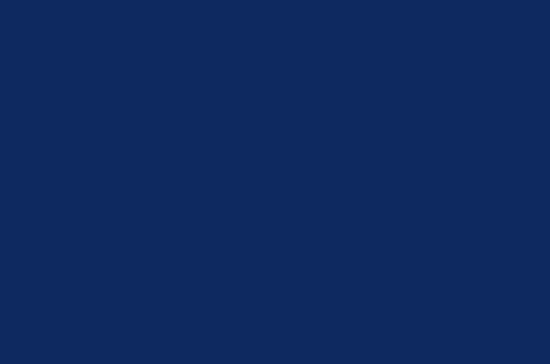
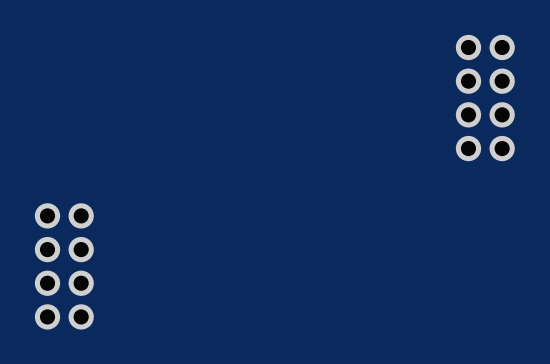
part: none -> (485, 98)
part: none -> (64, 266)

